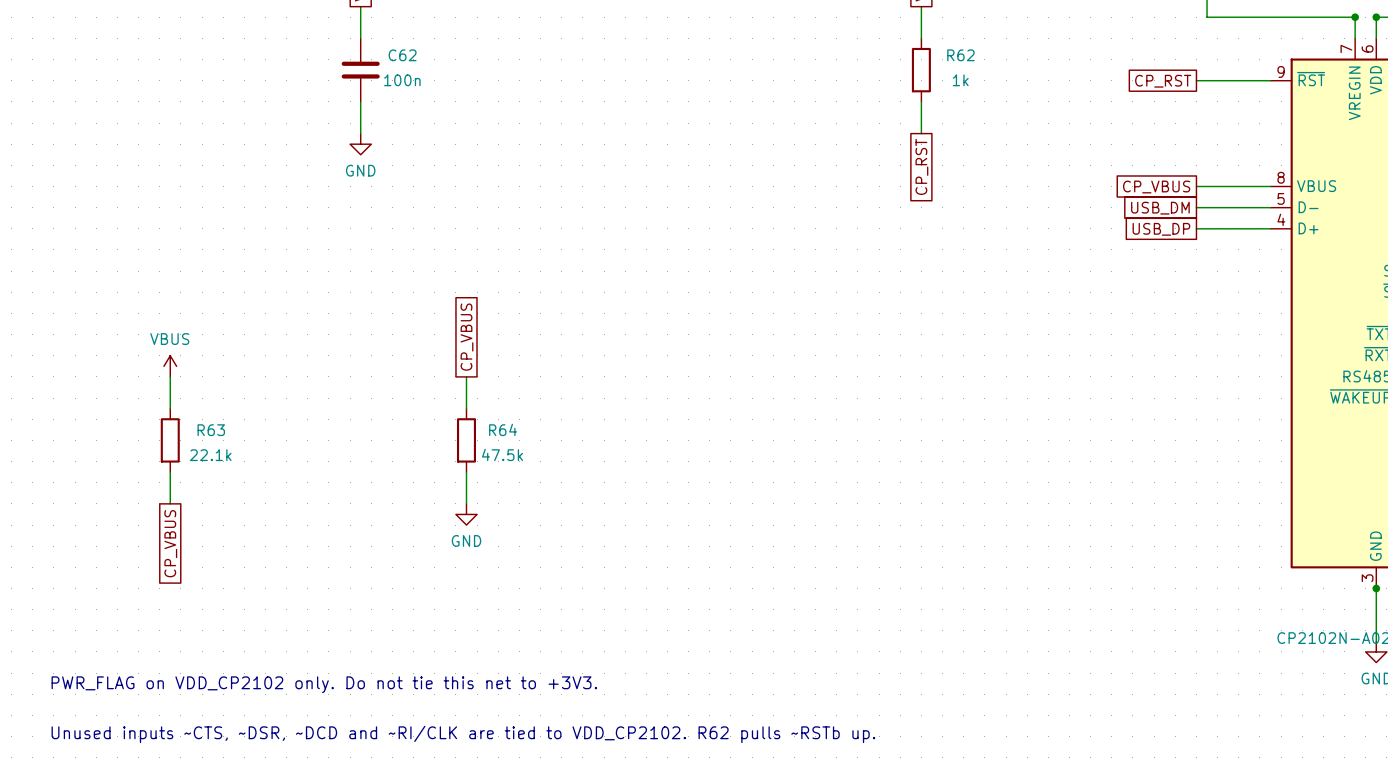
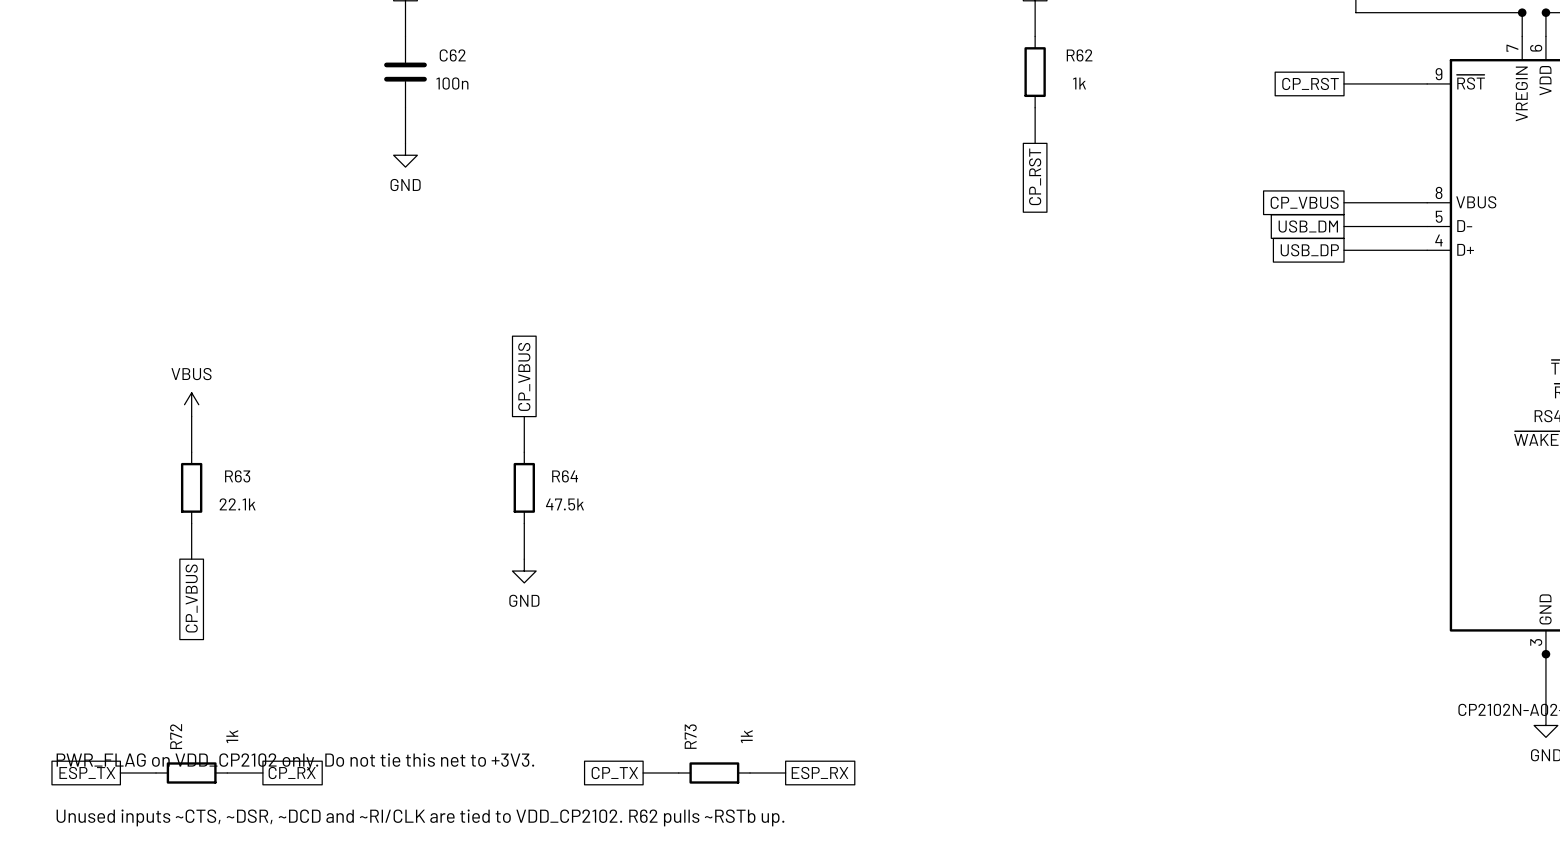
global label: none -> ESP_TX (87, 772)
wire: none -> (120, 772) (156, 772)
R72: none -> 1k (191, 772)
wire: none -> (227, 772) (262, 772)
global label: none -> CP_RX (292, 773)
global label: none -> CP_TX (614, 773)
wire: none -> (643, 772) (678, 772)
R73: none -> 1k (714, 772)
wire: none -> (750, 772) (785, 772)
global label: none -> ESP_RX (819, 772)

